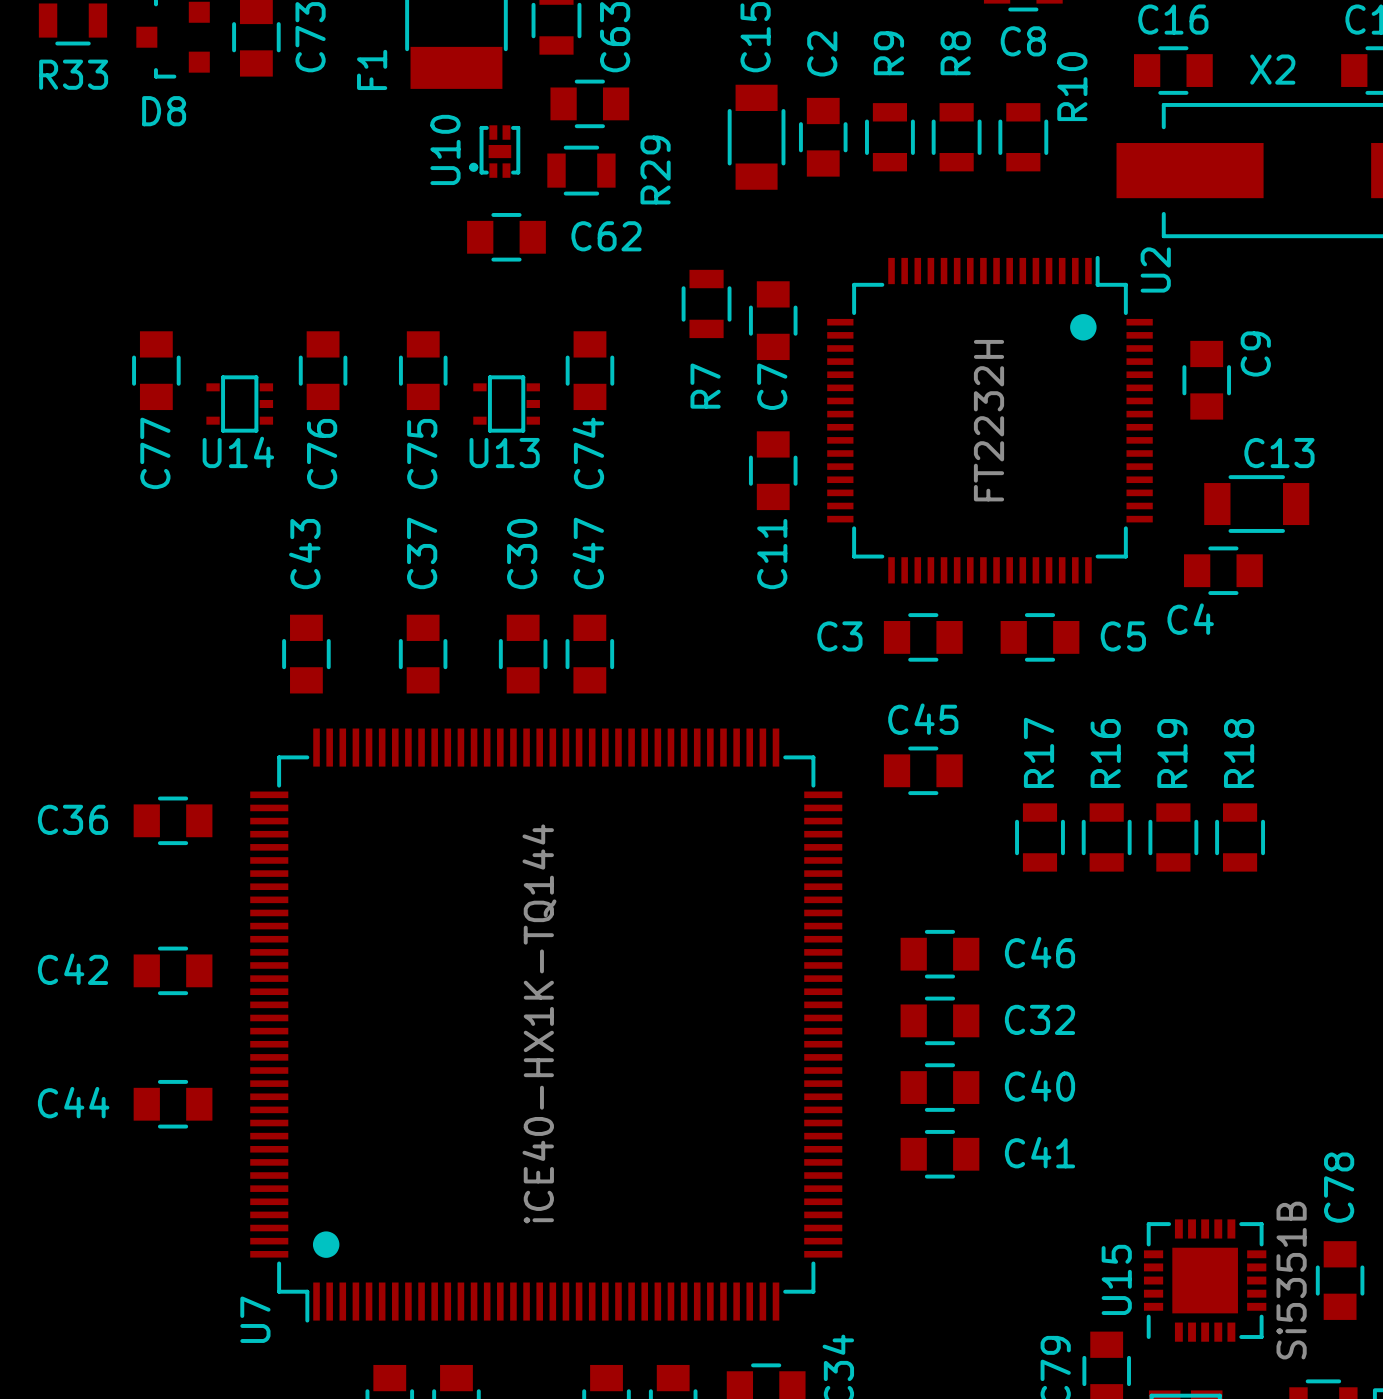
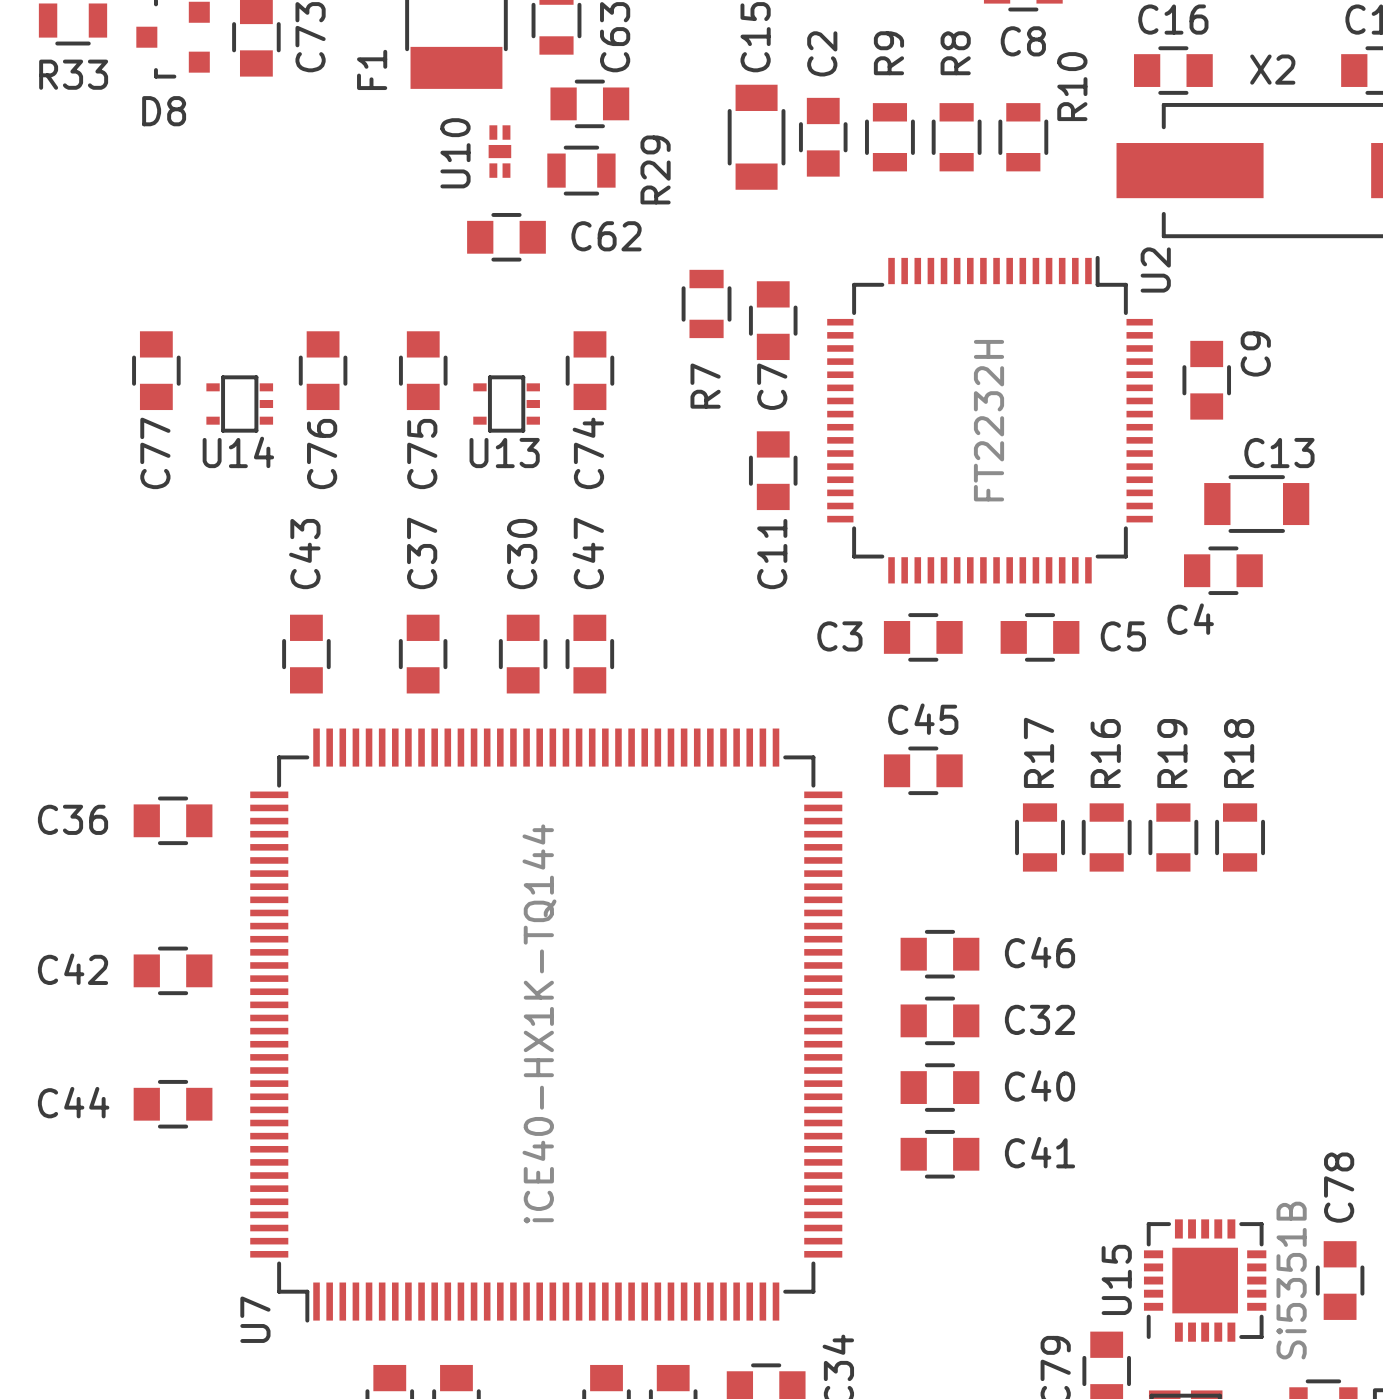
U10 footprint: [469, 125, 521, 178] -> [488, 125, 512, 178]
U2 footprint: [827, 255, 1153, 584] -> [827, 255, 1153, 584]
U7 footprint: [250, 728, 843, 1323] -> [250, 728, 843, 1323]

